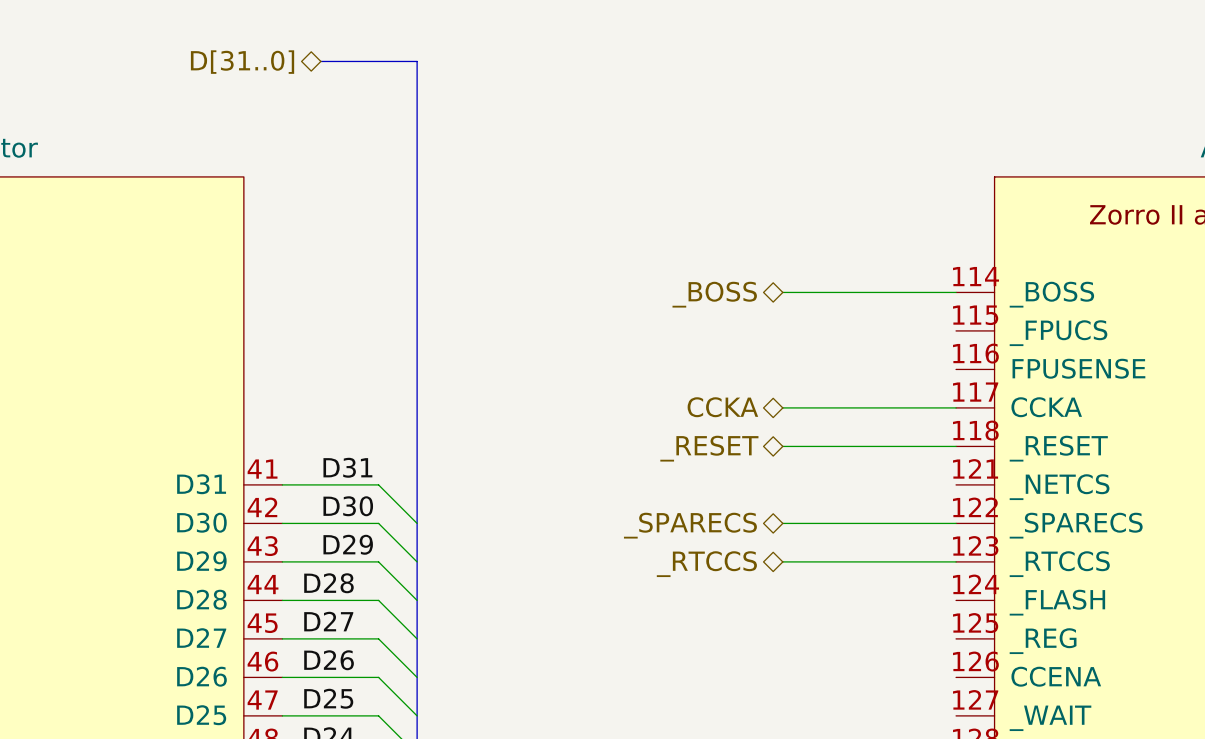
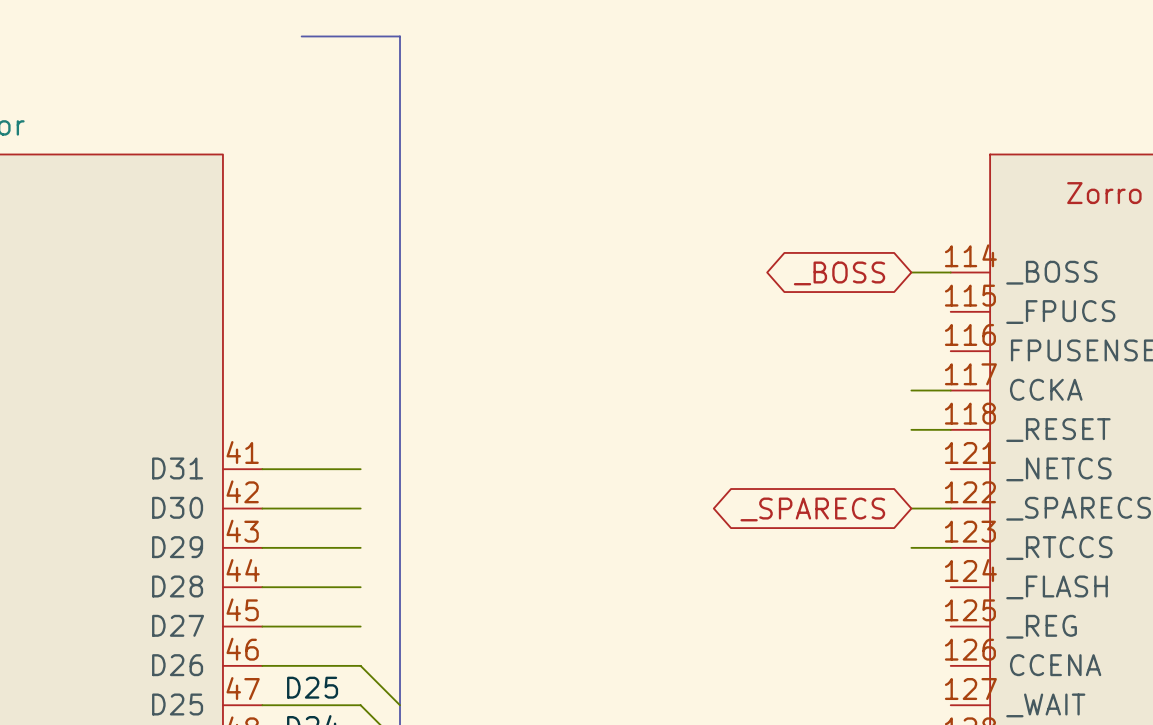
hierarchical label: D[31..0] (242, 62) -> none
wire: (782, 292) (917, 292) -> none
hierarchical label: _BOSS (714, 294) -> none
global label: none -> _BOSS (839, 273)
hierarchical label: CCKA (722, 407) -> none
wire: (782, 407) (917, 407) -> none
wire: (782, 446) (917, 446) -> none
hierarchical label: _RESET (709, 448) -> none
label: D31 (347, 467) -> none
wire: (378, 484) (417, 523) -> none
label: D30 (348, 506) -> none
wire: (378, 523) (417, 561) -> none
wire: (782, 523) (917, 523) -> none
hierarchical label: _SPARECS (690, 525) -> none
global label: none -> _SPARECS (812, 509)
label: D29 (348, 544) -> none
wire: (378, 561) (417, 600) -> none
wire: (782, 561) (917, 561) -> none
hierarchical label: _RTCCS (706, 564) -> none
label: D28 (328, 583) -> none
wire: (378, 600) (417, 638) -> none
label: D27 (328, 621) -> none
wire: (378, 638) (417, 677) -> none
label: D26 (329, 660) -> none

